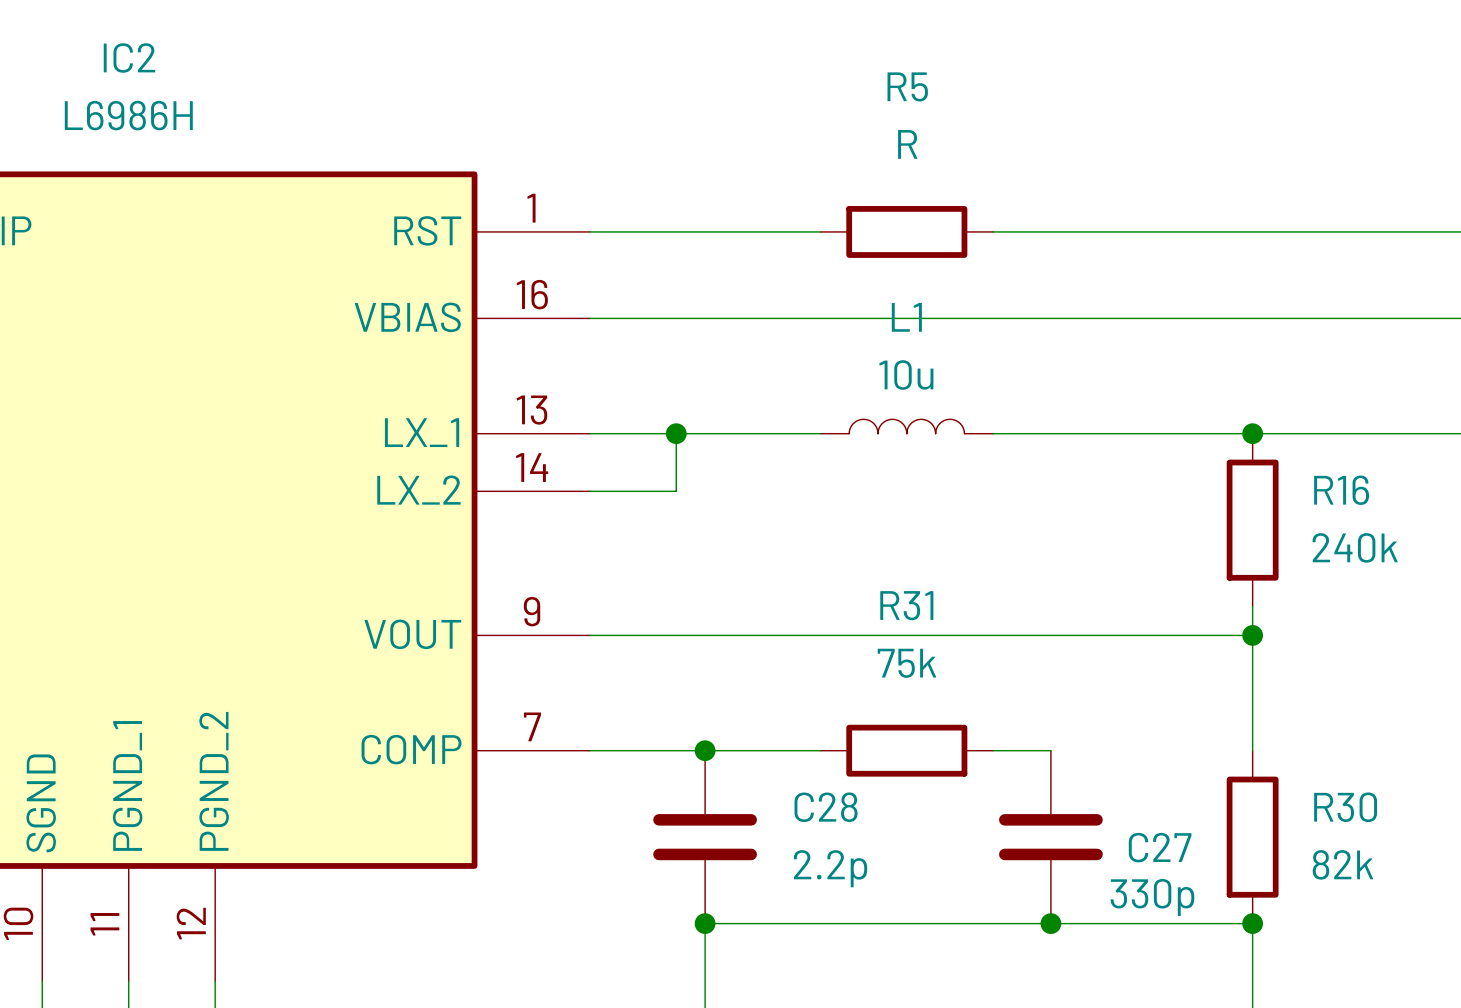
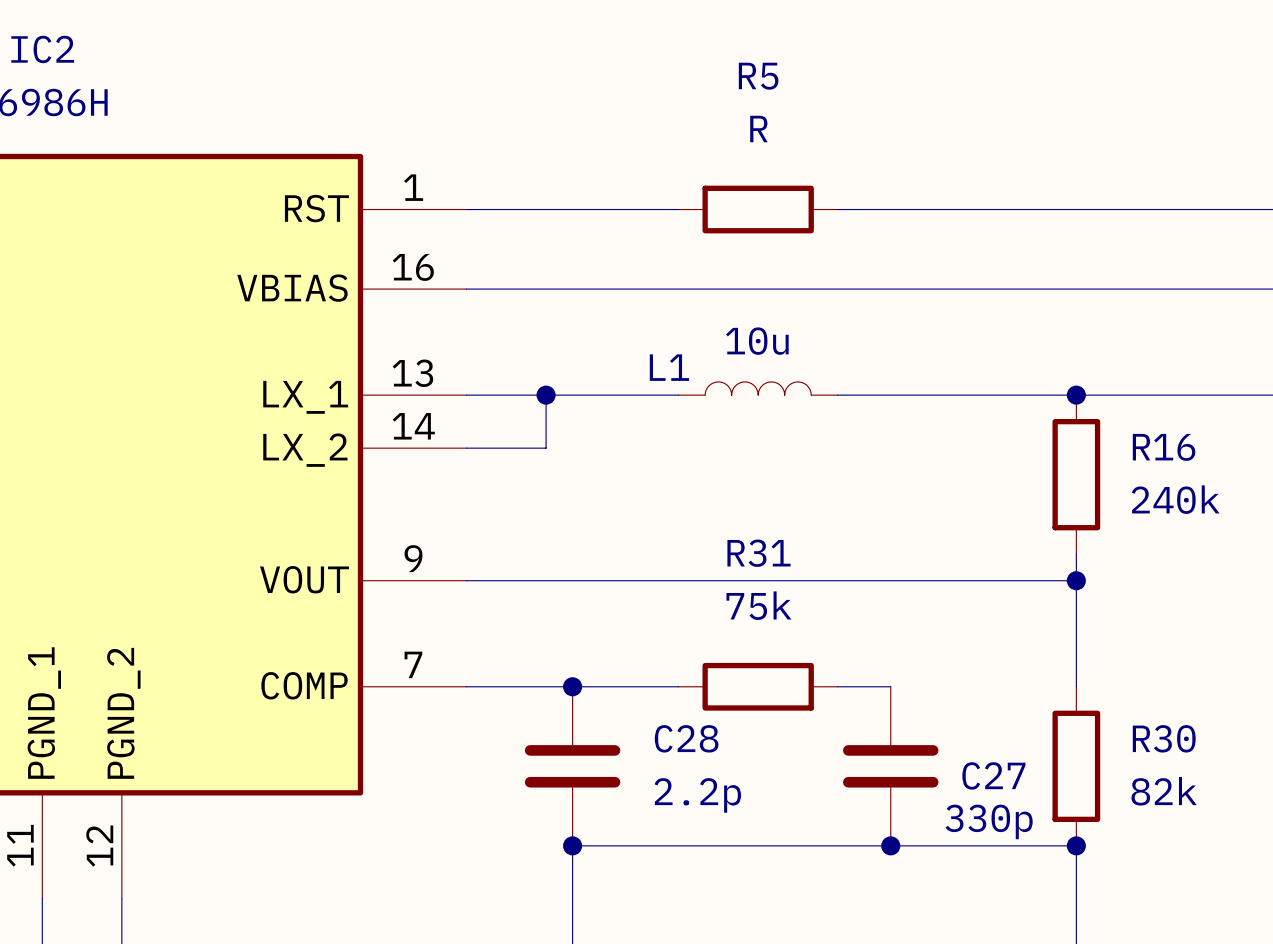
L1 name position: L1 (906, 317) -> L1 (669, 367)

